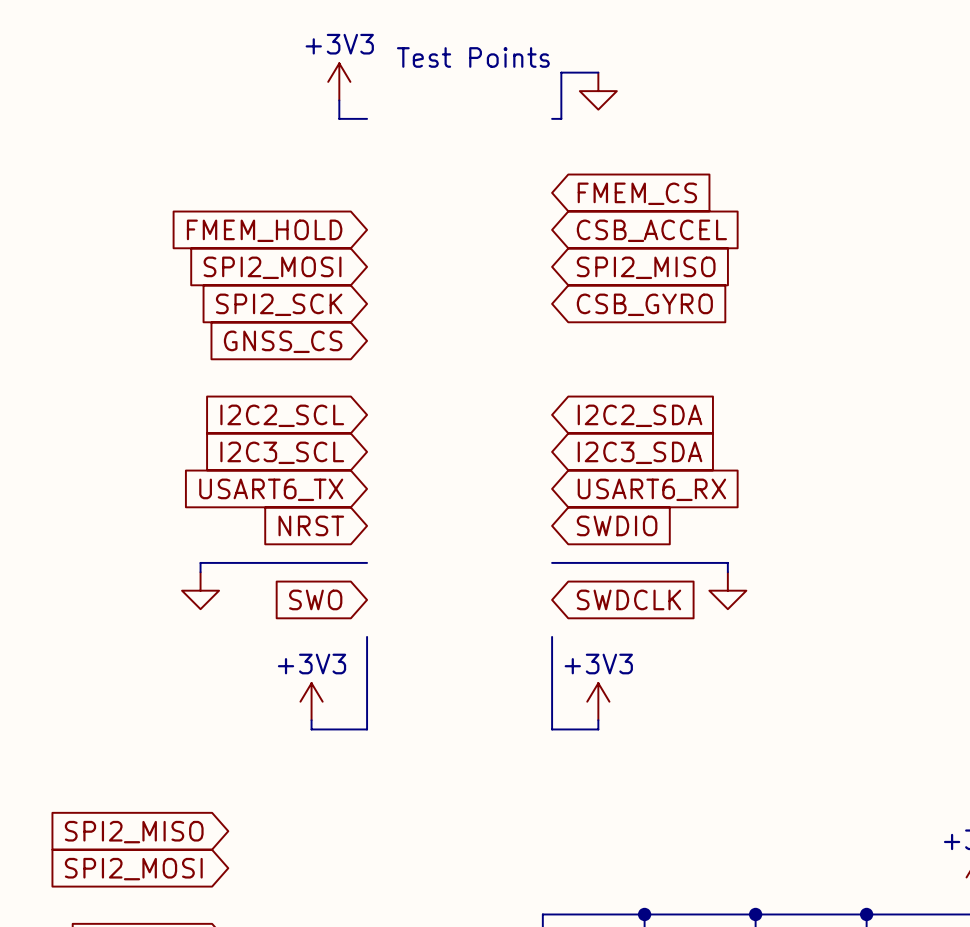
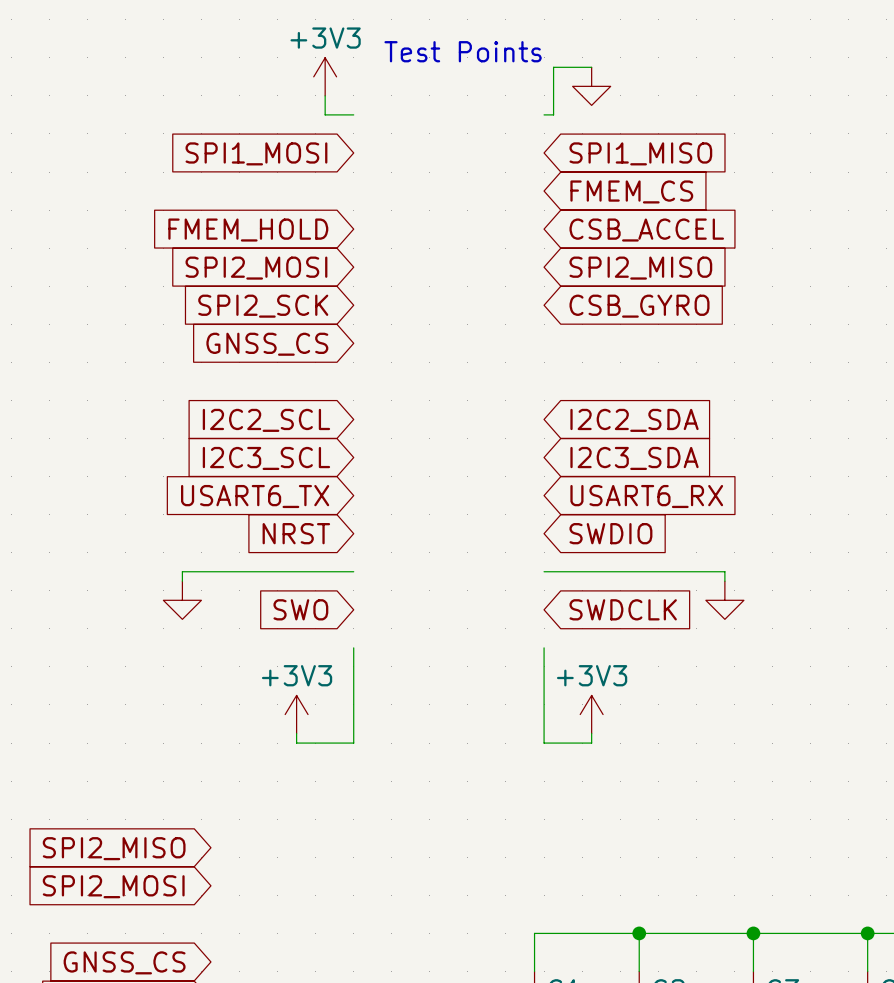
global label: none -> SPI1_MOSI (256, 153)
global label: none -> SPI1_MISO (640, 153)

